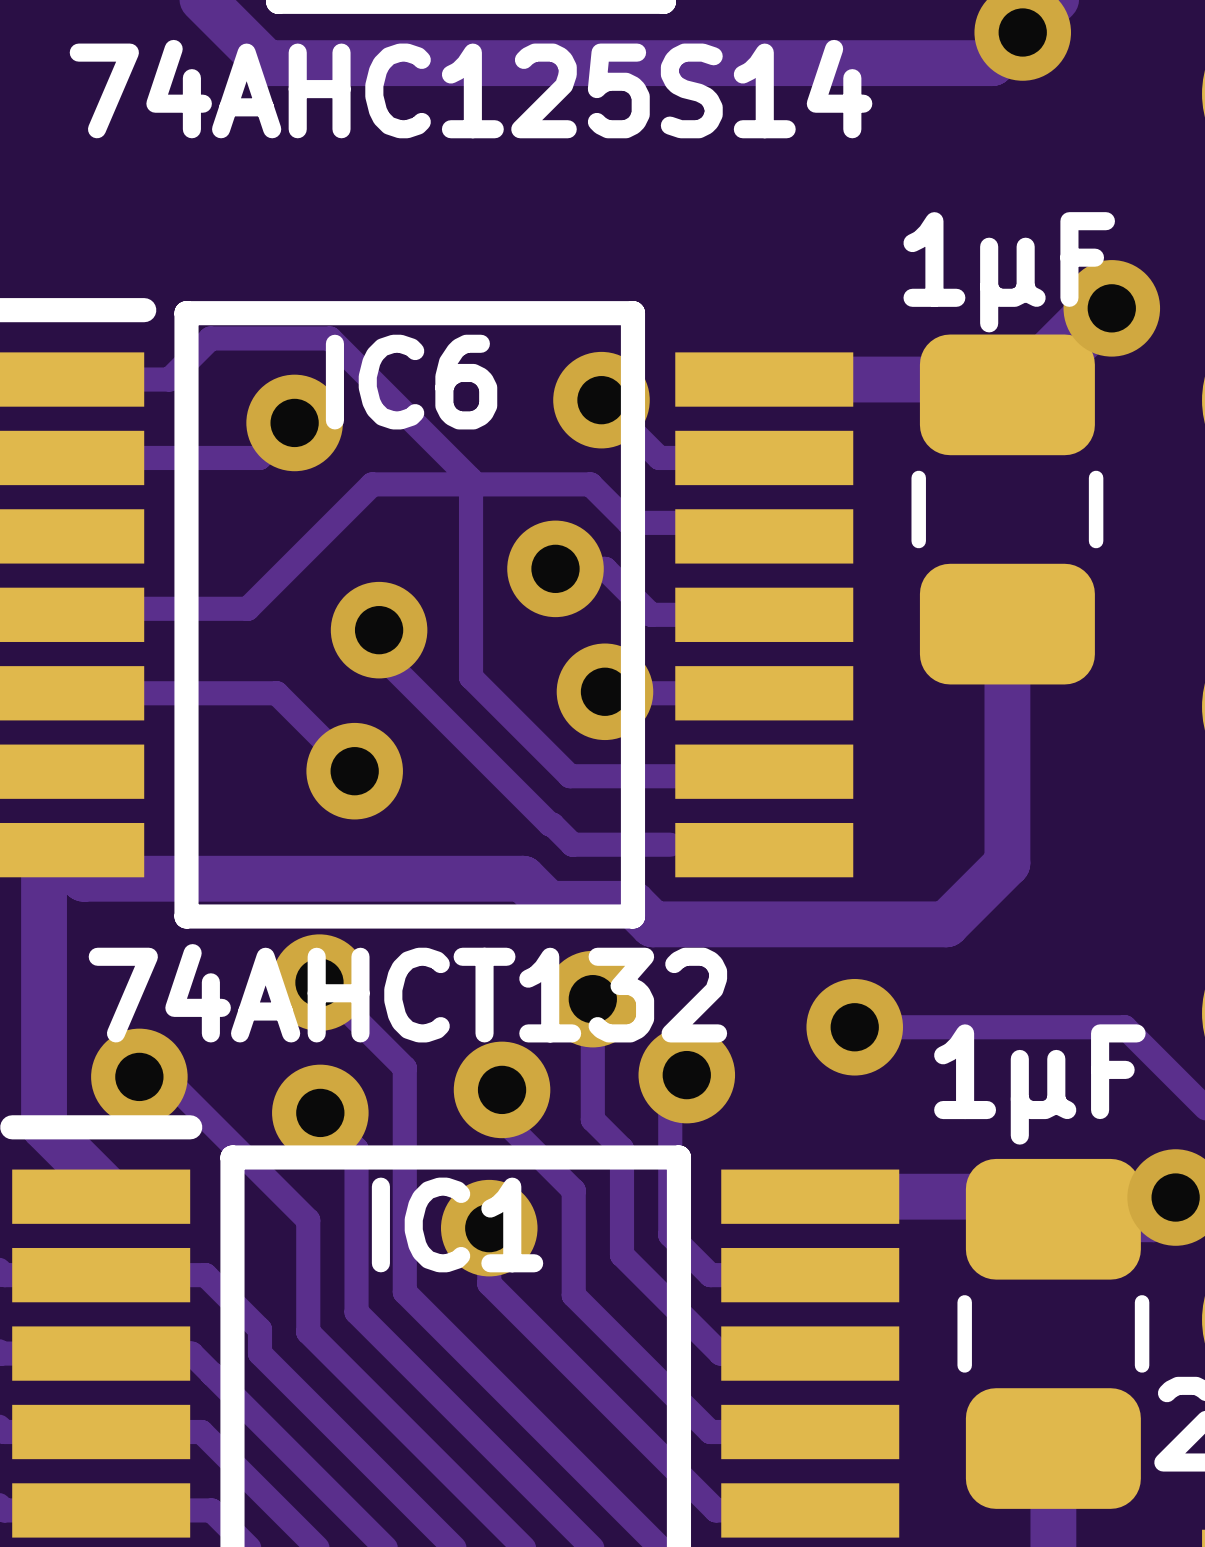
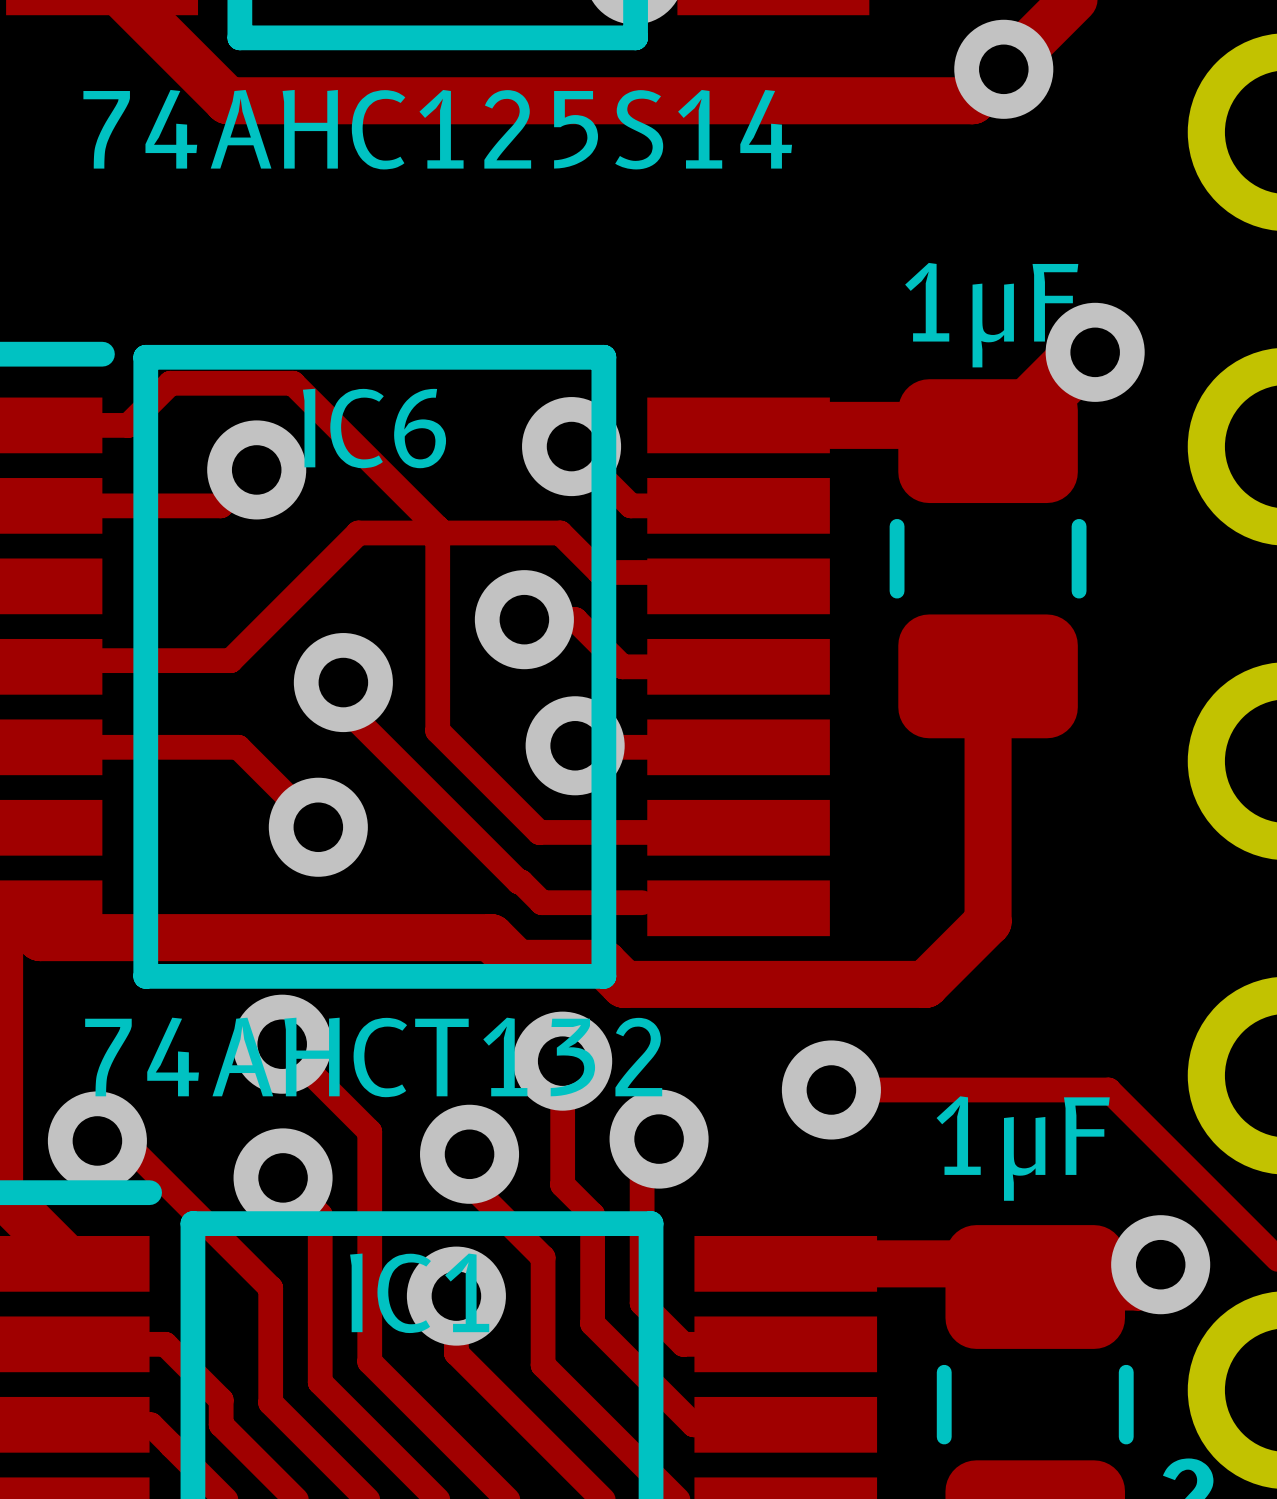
track: (393, 484) (372, 484) (247, 608) -> (358, 532) (230, 660) (208, 660)

